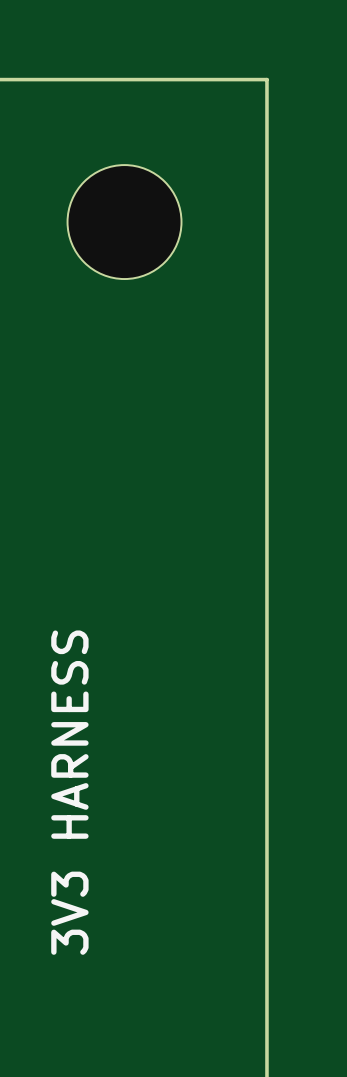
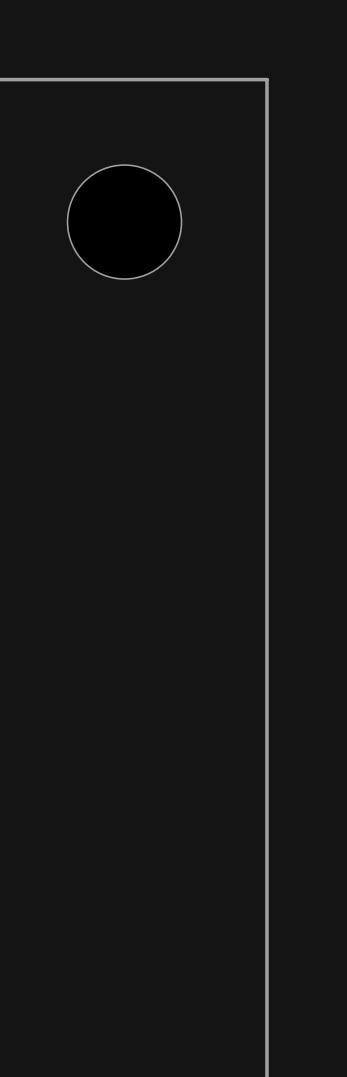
text: 3V3 HARNESS (69, 792) -> none

